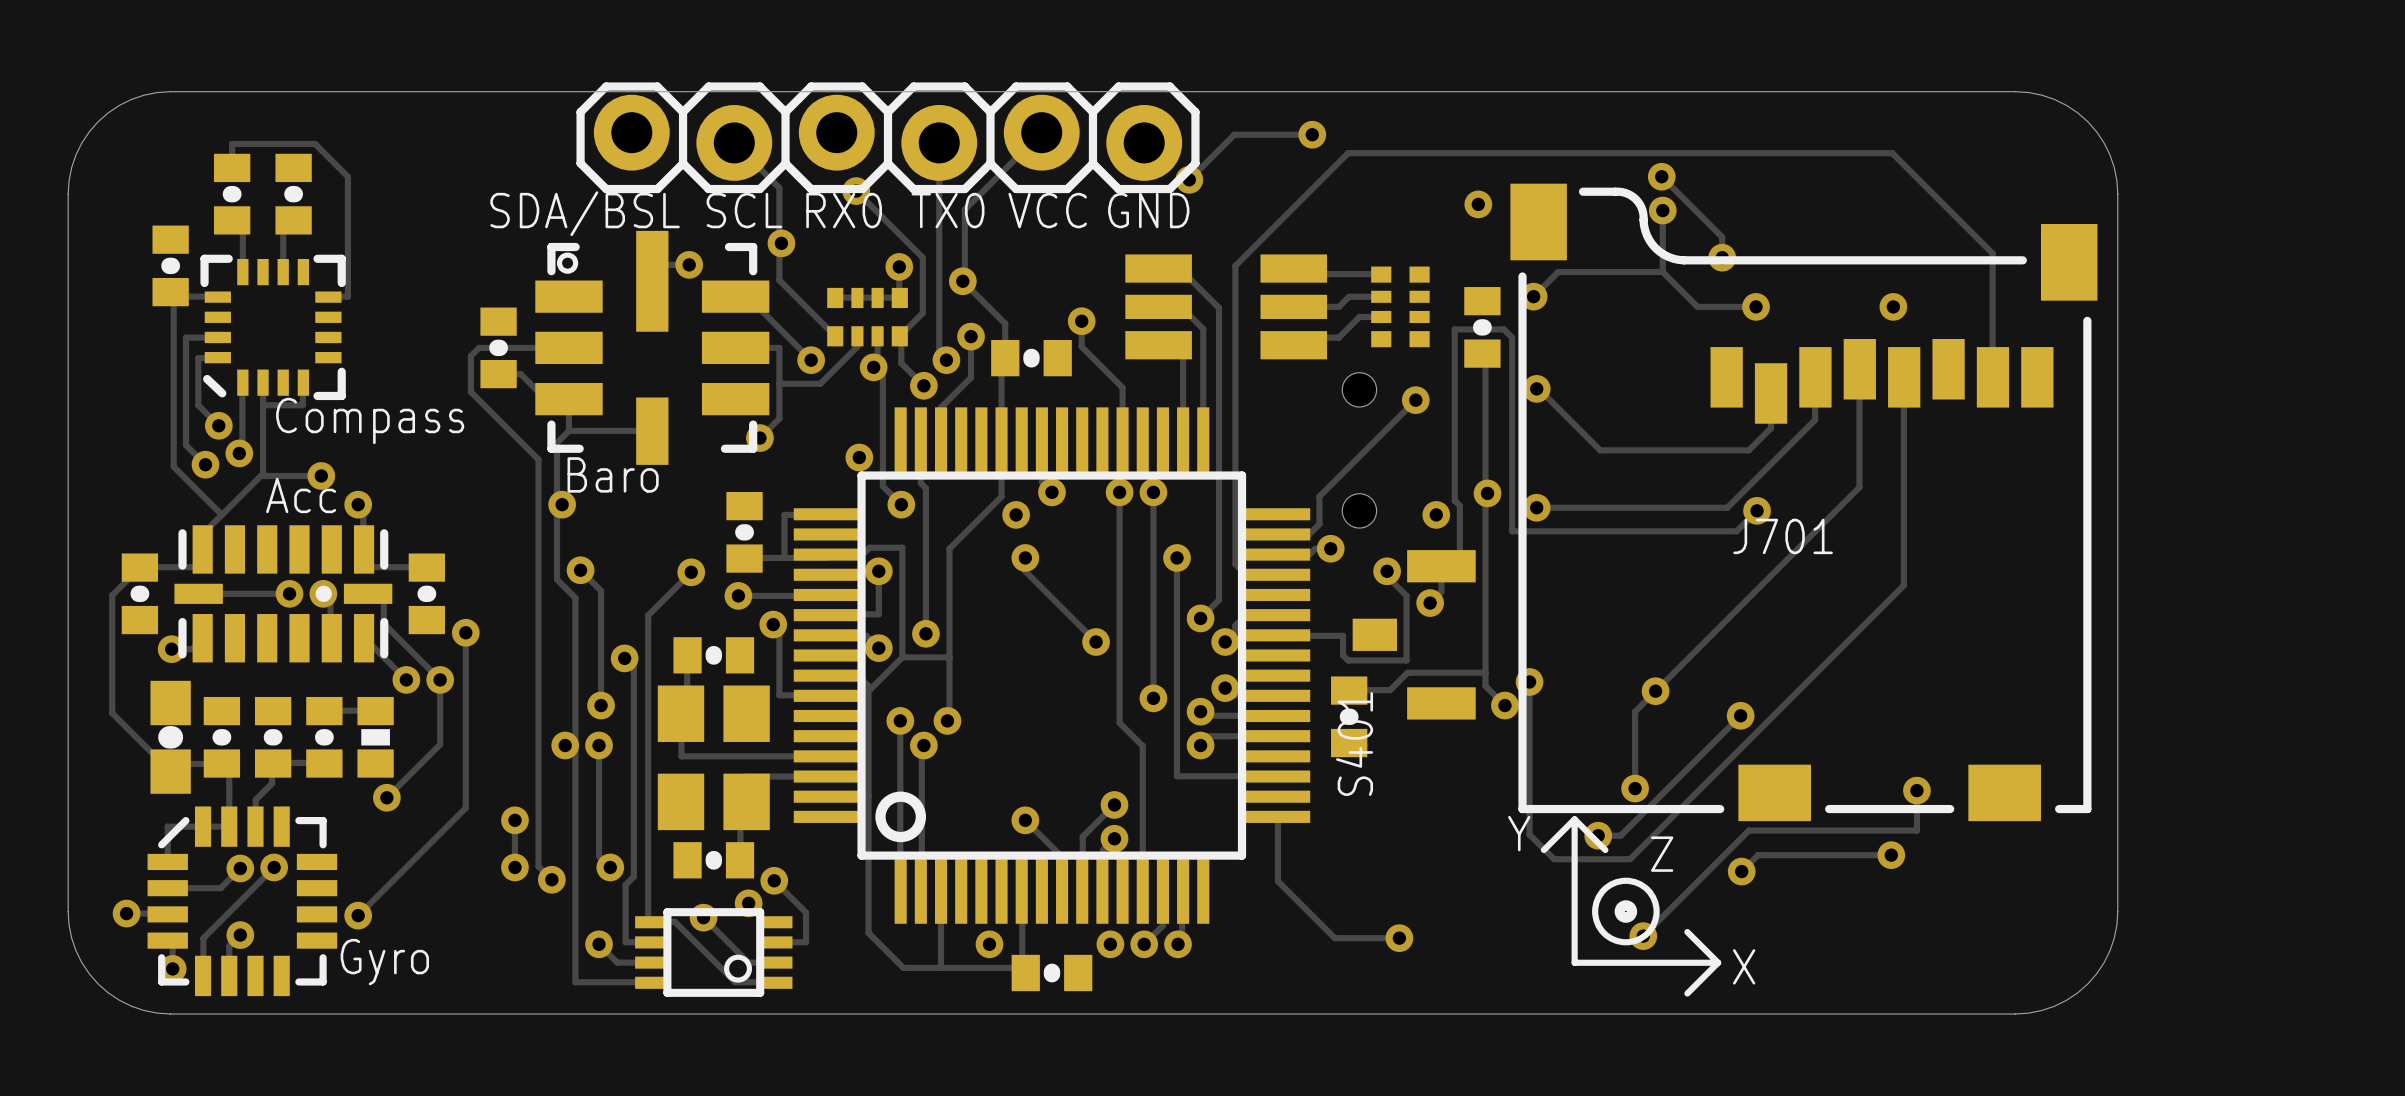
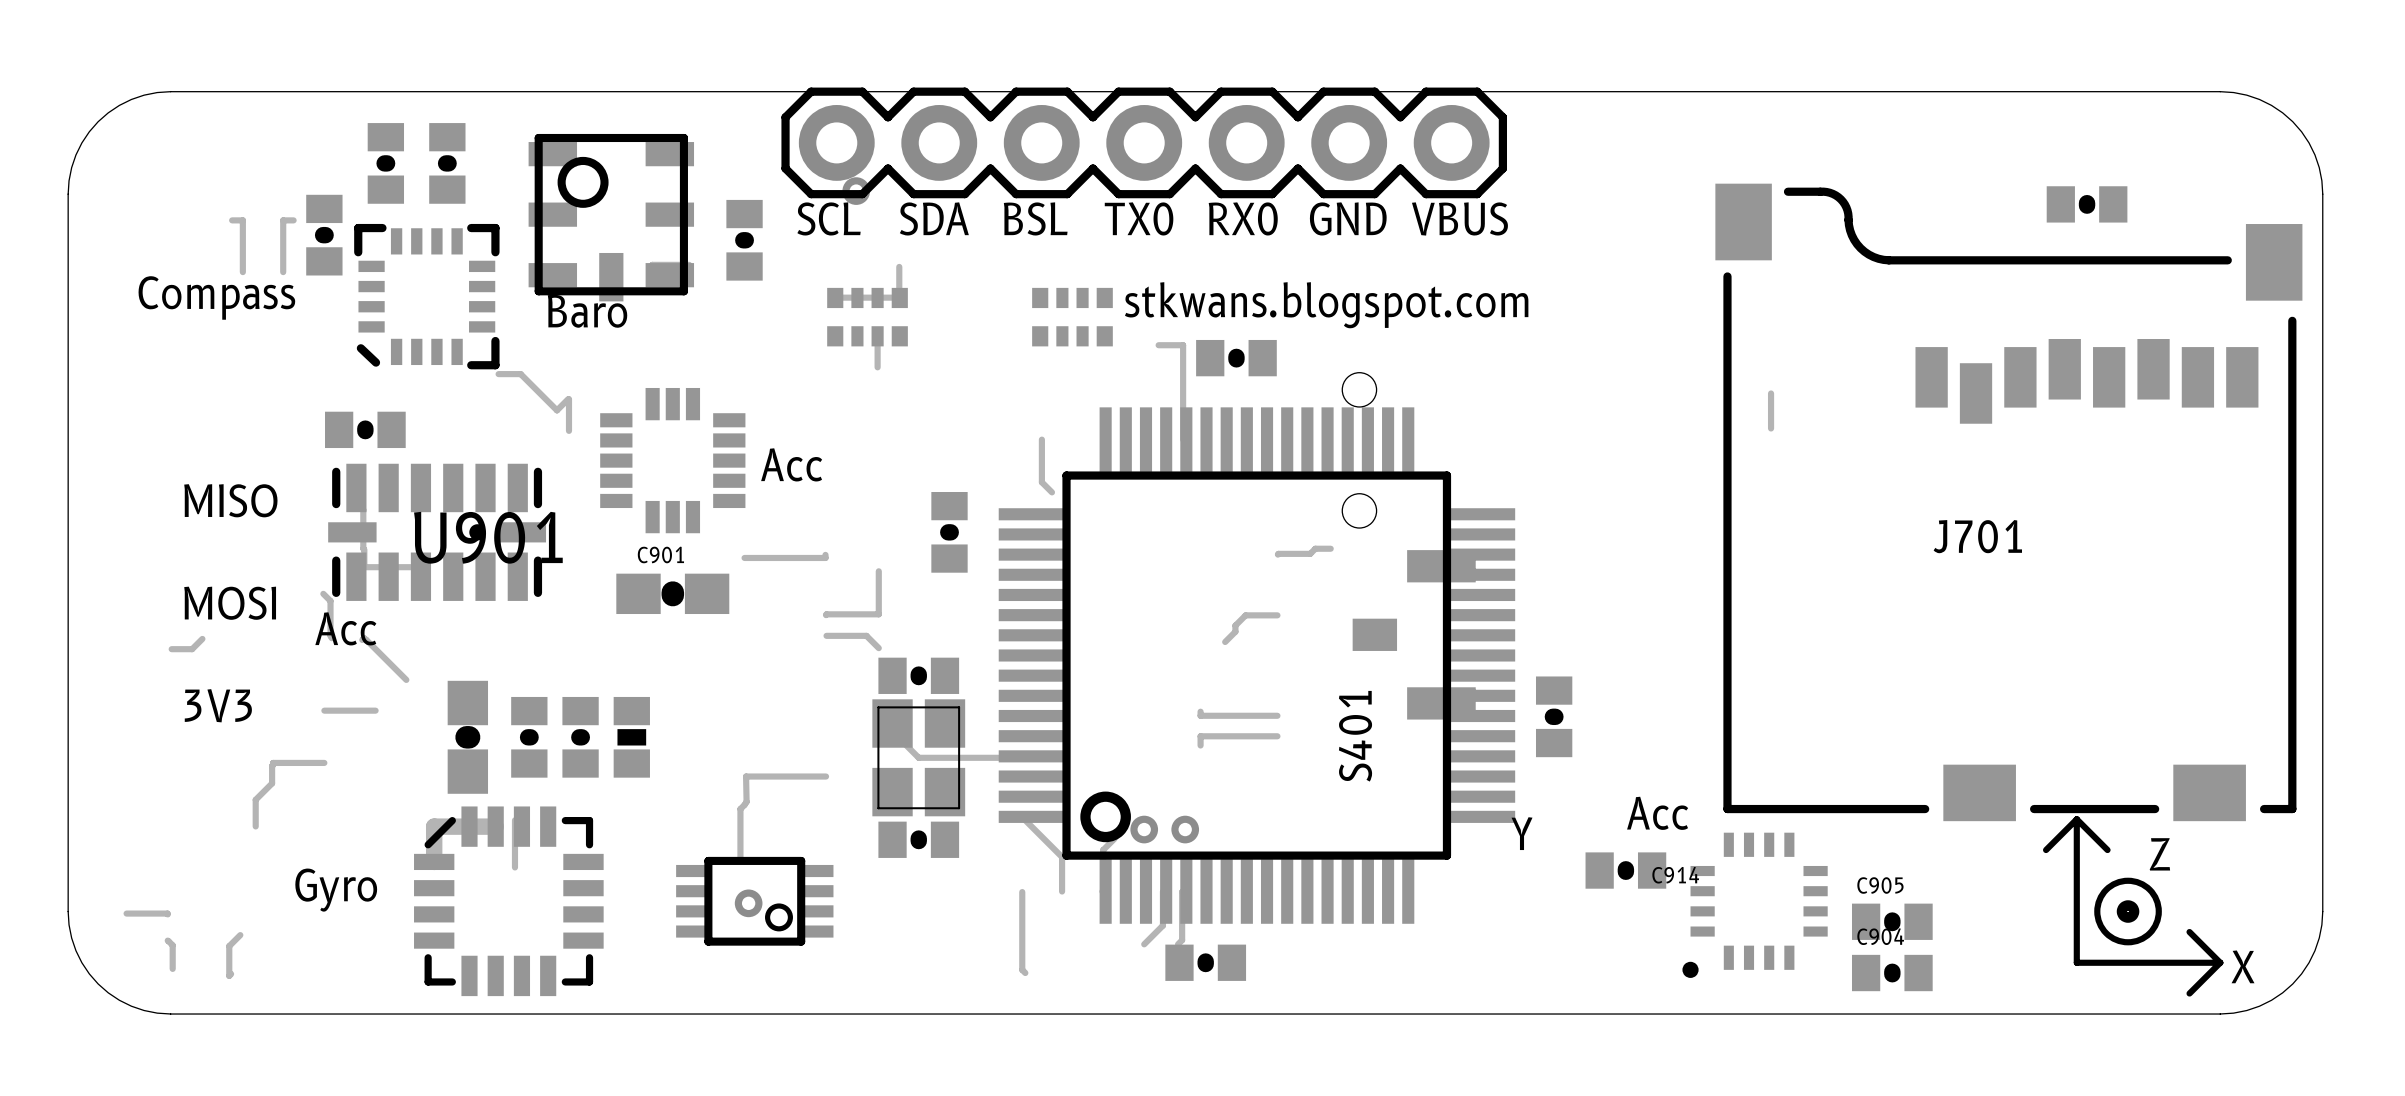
board edge: (2015, 91) (2041, 95) (2054, 99) (2077, 112) (2087, 121) (2096, 131) (2109, 154) (2114, 167) (2117, 194) (2116, 924) (2109, 950) (2096, 973) (2087, 983) (2077, 992) (2054, 1006) (2041, 1010) (2015, 1014) -> (2015, 91) (2220, 91) (2246, 95) (2259, 99) (2282, 112) (2301, 131) (2314, 154) (2319, 167) (2322, 194) (2322, 911) (2319, 938) (2314, 950) (2301, 973) (2292, 983) (2271, 1000) (2246, 1010) (2220, 1014) (2015, 1014)
track: (1041, 132) (964, 209) (964, 279) (962, 281) (1005, 323) (1005, 358) (1001, 361) (1001, 496) (949, 548) (949, 718) (947, 720) -> none
track: (1312, 134) (1234, 134) (1189, 179) -> none
via: (1312, 134) -> none
part: (888, 137) -> none
track: (734, 142) (779, 188) (779, 280) (835, 336) -> none
track: (939, 142) (939, 353) (946, 360) -> none
part: none -> (1144, 142)
part: none -> (385, 163)
part: none -> (447, 163)
track: (232, 167) (232, 143) (315, 143) (347, 176) (347, 296) (328, 296) -> none
track: (1661, 176) (1722, 237) (1722, 257) -> none
via: (1661, 176) -> none
via: (1189, 179) -> none
track: (856, 191) (922, 257) (922, 313) (899, 336) (901, 363) (923, 385) -> none
part: (232, 194) -> none
part: (293, 194) -> none
via: (1478, 204) -> none
part: none -> (2087, 204)
text position: SCL (744, 210) -> SCL (829, 218)
text position: RX0 (844, 210) -> RX0 (1243, 218)
text position: TX0 (948, 210) -> TX0 (1139, 218)
text: VCC (1047, 210) -> none
text position: GND (1148, 210) -> GND (1348, 218)
track: (1662, 210) (1662, 272) -> none
via: (1662, 210) -> none
text: SDA/BSL (585, 213) -> none
part: none -> (611, 217)
text: none -> SDA (934, 218)
text: none -> BSL (1035, 218)
text: none -> VBUS (1459, 218)
part: none -> (324, 235)
part: none -> (744, 240)
via: (781, 243) -> none
via: (1722, 257) -> none
via: (689, 264) -> none
part: (170, 265) -> none
via: (899, 266) -> none
track: (1158, 268) (1180, 268) (1219, 307) (1219, 599) (1200, 618) -> none
track: (1293, 268) (1293, 274) (1380, 274) -> none
track: (1662, 272) (1558, 272) (1533, 296) -> none
track: (1662, 272) (1697, 306) (1756, 306) -> none
via: (962, 281) -> none
track: (217, 296) (170, 296) (170, 292) (173, 298) (173, 466) (221, 514) -> none
track: (735, 296) (747, 296) (811, 360) -> none
track: (1381, 296) (1349, 296) (1338, 306) (1293, 306) -> none
via: (1533, 296) -> none
track: (1158, 306) (1181, 306) (1203, 329) (1203, 439) -> none
part: (1226, 306) -> none
text: none -> stkwans.blogspot.com (1326, 305)
part rotation: 0° (1400, 306) -> 90° clockwise (1072, 317)
part position: (1400, 306) -> (1072, 317)
via: (1756, 306) -> none
via: (1893, 306) -> none
track: (1381, 316) (1359, 316) (1338, 337) (1301, 337) (1293, 345) -> none
track: (1081, 321) (1081, 346) (1122, 387) (1122, 439) -> none
via: (1081, 321) -> none
part position: (273, 327) -> (426, 296)
part: (1482, 327) -> none
track: (857, 336) (857, 346) (820, 383) (779, 383) -> none
track: (971, 336) (971, 377) (941, 407) (941, 439) -> none
via: (971, 336) -> none
track: (217, 337) (186, 337) (186, 445) (205, 464) -> none
part: (498, 347) -> none
track: (568, 347) (479, 347) (470, 356) (470, 391) (538, 459) (538, 866) (551, 879) -> none
part: (652, 347) -> none
track: (735, 347) (779, 347) (779, 418) (759, 438) -> none
track: (1482, 354) (1485, 357) (1485, 686) (1504, 705) -> none
track: (217, 358) (198, 358) (198, 405) (218, 425) -> none
part: (1031, 358) -> none
part: none -> (1236, 358)
via: (811, 360) -> none
via: (946, 360) -> none
track: (873, 367) (877, 367) (882, 372) (882, 486) (901, 504) -> none
via: (873, 367) -> none
track: (1859, 369) (1859, 487) (1635, 711) (1635, 788) -> none
track: (1815, 377) (1815, 419) (1727, 507) (1536, 507) -> none
track: (1903, 377) (1903, 585) (1629, 859) (1554, 859) (1529, 834) (1529, 681) -> none
track: (1992, 377) (1992, 253) (1892, 153) (1348, 153) (1235, 265) (1235, 564) (1245, 574) (1277, 574) -> none
track: (242, 382) (242, 450) (239, 453) -> none
track: (263, 382) (263, 475) (321, 475) -> none
track: (302, 382) (302, 405) (263, 405) -> none
via: (923, 385) -> none
track: (1536, 388) (1600, 450) (1748, 450) (1770, 428) -> none
via: (1536, 388) -> none
track: (1415, 400) (1319, 496) (1319, 524) (1309, 534) (1278, 534) -> none
via: (1415, 400) -> none
text position: Compass (370, 420) -> Compass (216, 297)
via: (218, 425) -> none
part: none -> (365, 429)
track: (652, 430) (568, 430) (557, 442) (557, 579) (575, 597) (575, 982) (651, 982) -> none
via: (759, 438) -> none
track: (920, 439) (920, 483) (925, 488) (925, 633) -> none
via: (239, 453) -> none
via: (859, 457) -> none
U901: none -> (672, 460)
via: (205, 464) -> none
text: none -> Acc (791, 464)
text position: Baro (613, 474) -> Baro (587, 311)
track: (264, 475) (262, 473) (203, 533) (202, 567) (139, 567) -> none
via: (321, 475) -> none
via: (1051, 492) -> none
track: (1119, 492) (1119, 722) (1142, 746) (1142, 891) -> none
via: (1119, 492) -> none
track: (1153, 492) (1153, 698) -> none
via: (1153, 492) -> none
via: (1487, 493) -> none
text position: Acc (301, 495) -> Acc (345, 628)
text: none -> MISO (230, 500)
J701 position: (1803, 502) -> (2008, 502)
via: (358, 504) -> none
via: (562, 504) -> none
via: (901, 504) -> none
via: (1536, 507) -> none
track: (1757, 510) (1736, 531) (1512, 531) (1512, 337) (1503, 329) (1454, 329) (1454, 500) (1459, 505) (1459, 566) (1441, 566) (1441, 591) (1430, 603) -> none
via: (1757, 510) -> none
track: (826, 514) (784, 514) (784, 557) -> none
via: (1016, 514) -> none
via: (1436, 514) -> none
part: (744, 532) -> none
part: none -> (949, 532)
via: (1330, 548) -> none
track: (826, 554) (828, 552) (864, 552) (869, 547) (902, 547) (902, 657) -> none
track: (1025, 557) (1025, 571) (1096, 642) -> none
via: (1025, 557) -> none
track: (1177, 557) (1177, 776) (1277, 776) -> none
via: (1177, 557) -> none
track: (139, 567) (112, 595) (112, 713) (170, 771) (170, 763) (221, 763) -> none
track: (580, 570) (601, 590) (601, 705) -> none
via: (580, 570) -> none
via: (878, 571) -> none
track: (1387, 571) (1387, 576) (1406, 595) (1406, 660) (1348, 660) (1343, 655) (1343, 635) (1278, 635) -> none
via: (1387, 571) -> none
track: (691, 572) (648, 615) (648, 921) (674, 921) (735, 982) (779, 982) (776, 982) -> none
via: (691, 572) -> none
part: (139, 593) -> none
track: (198, 593) (289, 593) -> none
part position: (283, 593) -> (437, 532)
via: (289, 593) -> none
via: (323, 593) -> none
track: (368, 593) (383, 593) (383, 623) (440, 679) (440, 744) (386, 797) -> none
part: (426, 593) -> none
C901: none -> (672, 593)
track: (826, 594) (738, 595) -> none
via: (738, 595) -> none
text: none -> MOSI (230, 603)
via: (1430, 603) -> none
via: (1200, 618) -> none
track: (773, 624) (779, 630) (779, 695) (825, 695) -> none
via: (773, 624) -> none
track: (465, 632) (465, 808) (358, 915) -> none
via: (465, 632) -> none
via: (925, 633) -> none
via: (1096, 642) -> none
via: (1225, 642) -> none
via: (878, 648) -> none
via: (171, 649) -> none
track: (687, 655) (687, 706) (681, 713) (681, 756) (826, 756) -> none
part: (713, 655) -> none
track: (902, 657) (868, 689) -> none
track: (902, 657) (949, 657) -> none
track: (624, 658) (633, 667) (633, 876) (625, 884) (625, 942) (651, 942) -> none
via: (624, 658) -> none
part position: (1051, 665) -> (1256, 665)
track: (1485, 672) (1407, 672) (1390, 690) (1349, 690) -> none
track: (826, 675) (858, 675) (868, 686) (868, 933) (903, 967) (1020, 967) (1025, 973) -> none
part: none -> (918, 675)
via: (406, 679) -> none
via: (440, 679) -> none
via: (1529, 681) -> none
via: (1225, 688) -> none
via: (1655, 691) -> none
via: (1153, 698) -> none
text: none -> 3V3 (218, 705)
via: (601, 705) -> none
via: (1504, 705) -> none
via: (1200, 711) -> none
track: (1740, 715) (1620, 835) (1598, 835) -> none
via: (1740, 715) -> none
part: (1349, 716) -> none
part: none -> (1554, 716)
track: (900, 720) (900, 891) -> none
via: (900, 720) -> none
via: (947, 720) -> none
track: none -> (892, 723) (892, 731) (918, 757) (1031, 756)
part position: (170, 737) -> (467, 737)
part: (221, 737) -> none
part: (273, 737) -> none
part: (324, 737) -> none
part position: (375, 737) -> (631, 737)
part: none -> (529, 737)
part: none -> (580, 737)
via: (565, 745) -> none
track: (599, 745) (599, 856) (610, 867) -> none
via: (599, 745) -> none
track: (923, 745) (921, 747) (920, 891) -> none
via: (923, 745) -> none
via: (1200, 745) -> none
part: (713, 757) -> none
part: none -> (918, 757)
track: (221, 763) (229, 770) (229, 826) (167, 826) (167, 861) -> none
via: (1635, 788) -> none
track: (1916, 790) (1916, 830) (1748, 830) (1643, 936) -> none
via: (1916, 790) -> none
via: (386, 797) -> none
track: (1114, 804) (1082, 836) (1082, 891) -> none
via: (1114, 804) -> none
text: none -> Acc (1657, 813)
track: (1277, 816) (1277, 881) (1334, 938) (1399, 938) -> none
line: (1574, 819) (1543, 850) -> (2076, 819) (2046, 850)
line: (1574, 819) (1605, 850) -> (2076, 819) (2107, 850)
line: (1574, 819) (1574, 962) (1718, 962) -> (2076, 819) (2076, 962) (2220, 962)
via: (514, 820) -> none
via: (1025, 820) -> none
track: none -> (495, 826) (434, 826) (434, 861)
via: none -> (1144, 829)
via: none -> (1185, 829)
via: (1598, 835) -> none
via: (1114, 838) -> none
part: none -> (918, 839)
text position: Z (1662, 854) -> Z (2159, 854)
track: (1891, 855) (1758, 855) (1741, 871) -> none
via: (1891, 855) -> none
part: (713, 860) -> none
track: (274, 867) (203, 938) (203, 975) -> none
via: (274, 867) -> none
via: (514, 867) -> none
via: (610, 867) -> none
track: (240, 868) (220, 888) (167, 888) -> none
via: (240, 868) -> none
C914: none -> (1625, 870)
via: (1741, 871) -> none
via: (551, 879) -> none
track: (774, 880) (806, 912) (806, 942) (776, 942) -> none
via: (774, 880) -> none
track: (941, 891) (941, 967) -> none
part position: (242, 901) -> (508, 901)
part: none -> (1755, 905)
drawing position: (1625, 911) -> (2128, 911)
drawing position: (1625, 911) -> (2128, 911)
via: (126, 913) -> none
via: (358, 915) -> none
track: (703, 917) (748, 962) (776, 962) -> none
via: (703, 917) -> none
C905: none -> (1892, 921)
line: (1687, 932) (1718, 962) -> (2189, 932) (2220, 962)
via: (240, 935) -> none
via: (1643, 936) -> none
via: (1399, 938) -> none
track: (599, 944) (617, 962) (651, 962) -> none
via: (599, 944) -> none
via: (989, 944) -> none
via: (1110, 944) -> none
via: (1144, 944) -> none
via: (1178, 944) -> none
part position: (713, 952) -> (754, 901)
text position: Gyro (384, 962) -> Gyro (336, 890)
part: none -> (1205, 962)
line: (1718, 962) (1687, 993) -> (2220, 962) (2189, 993)
text position: X (1744, 966) -> X (2243, 966)
via: (172, 968) -> none
part: (1051, 973) -> none
C904: none -> (1892, 973)

